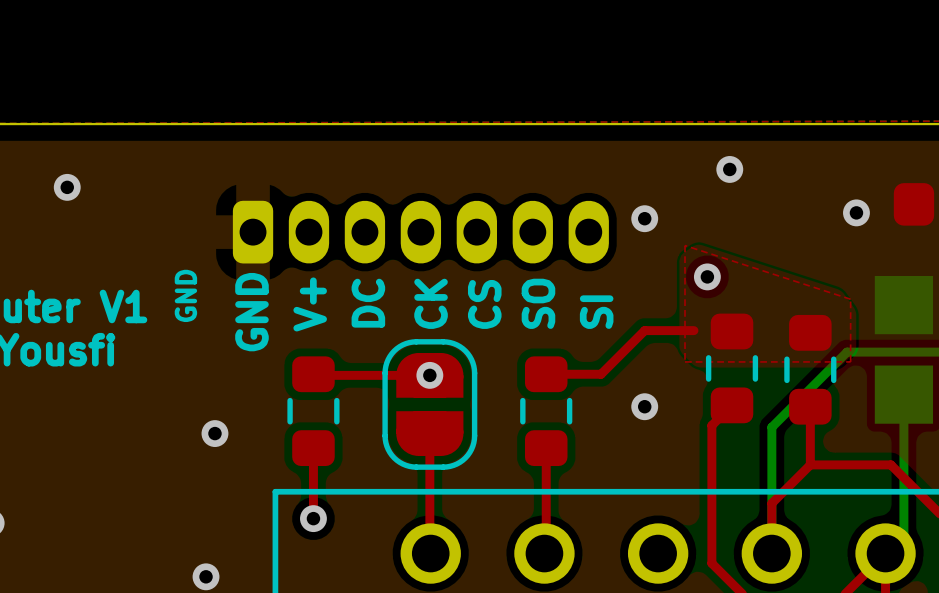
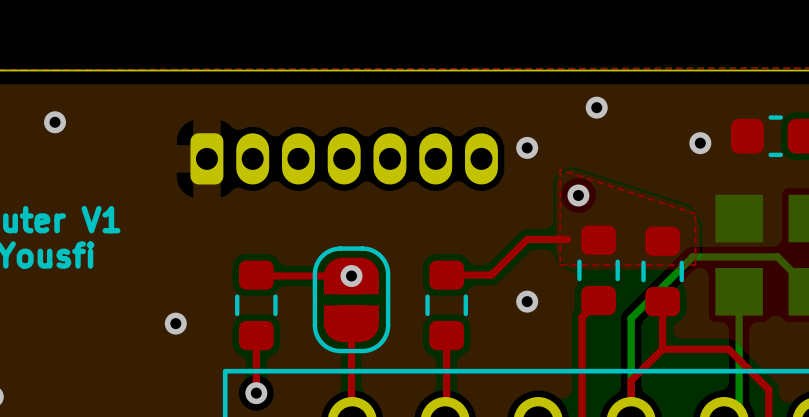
text: GND (185, 295) -> none
text: DC (368, 303) -> none
text: CK (431, 303) -> none
text: SO (538, 303) -> none
text: V+ (310, 304) -> none
text: CS (484, 304) -> none
text: GND (251, 312) -> none
text: SI (596, 312) -> none

